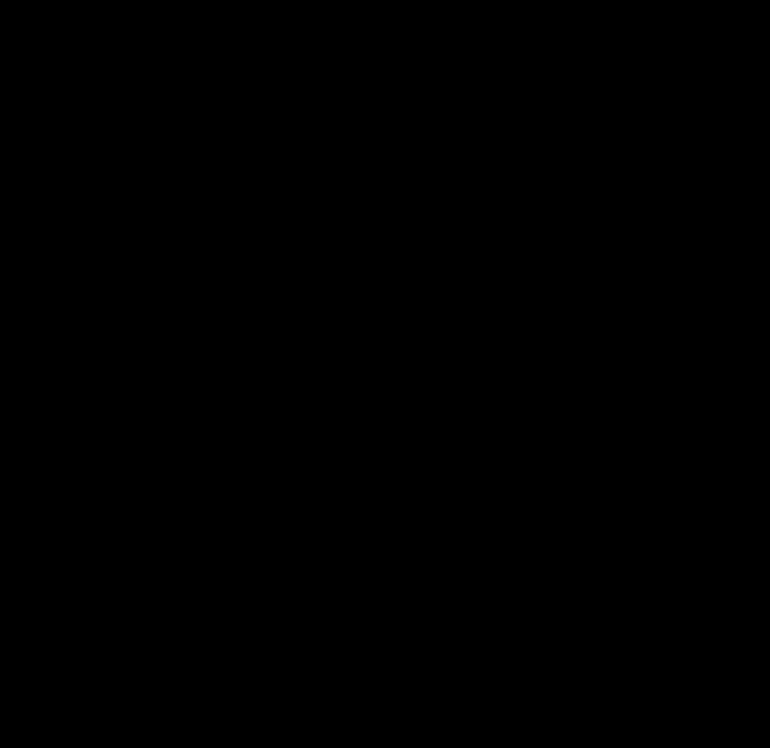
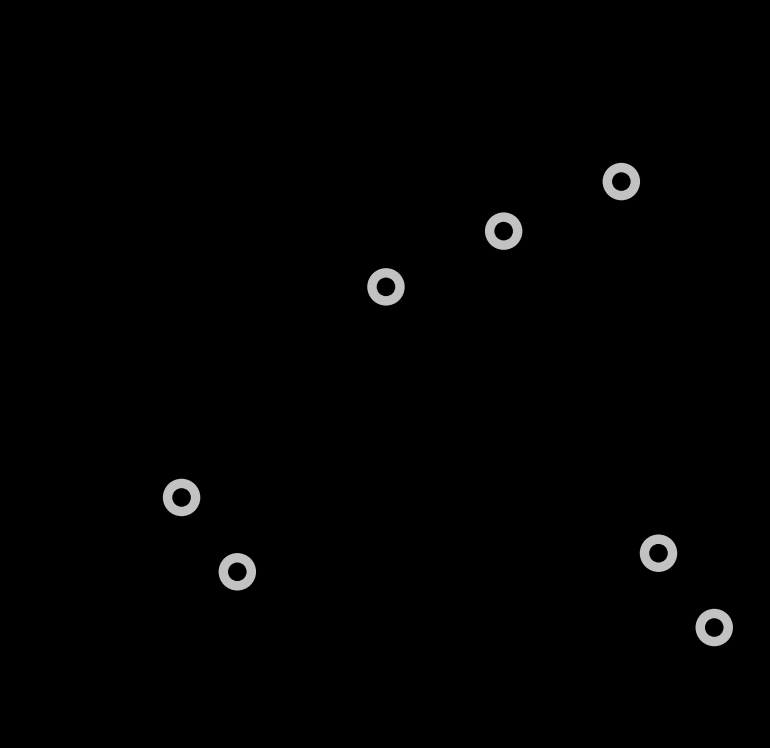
via: none -> (621, 181)
via: none -> (503, 231)
via: none -> (385, 286)
via: none -> (181, 497)
via: none -> (658, 553)
via: none -> (237, 571)
via: none -> (714, 627)

